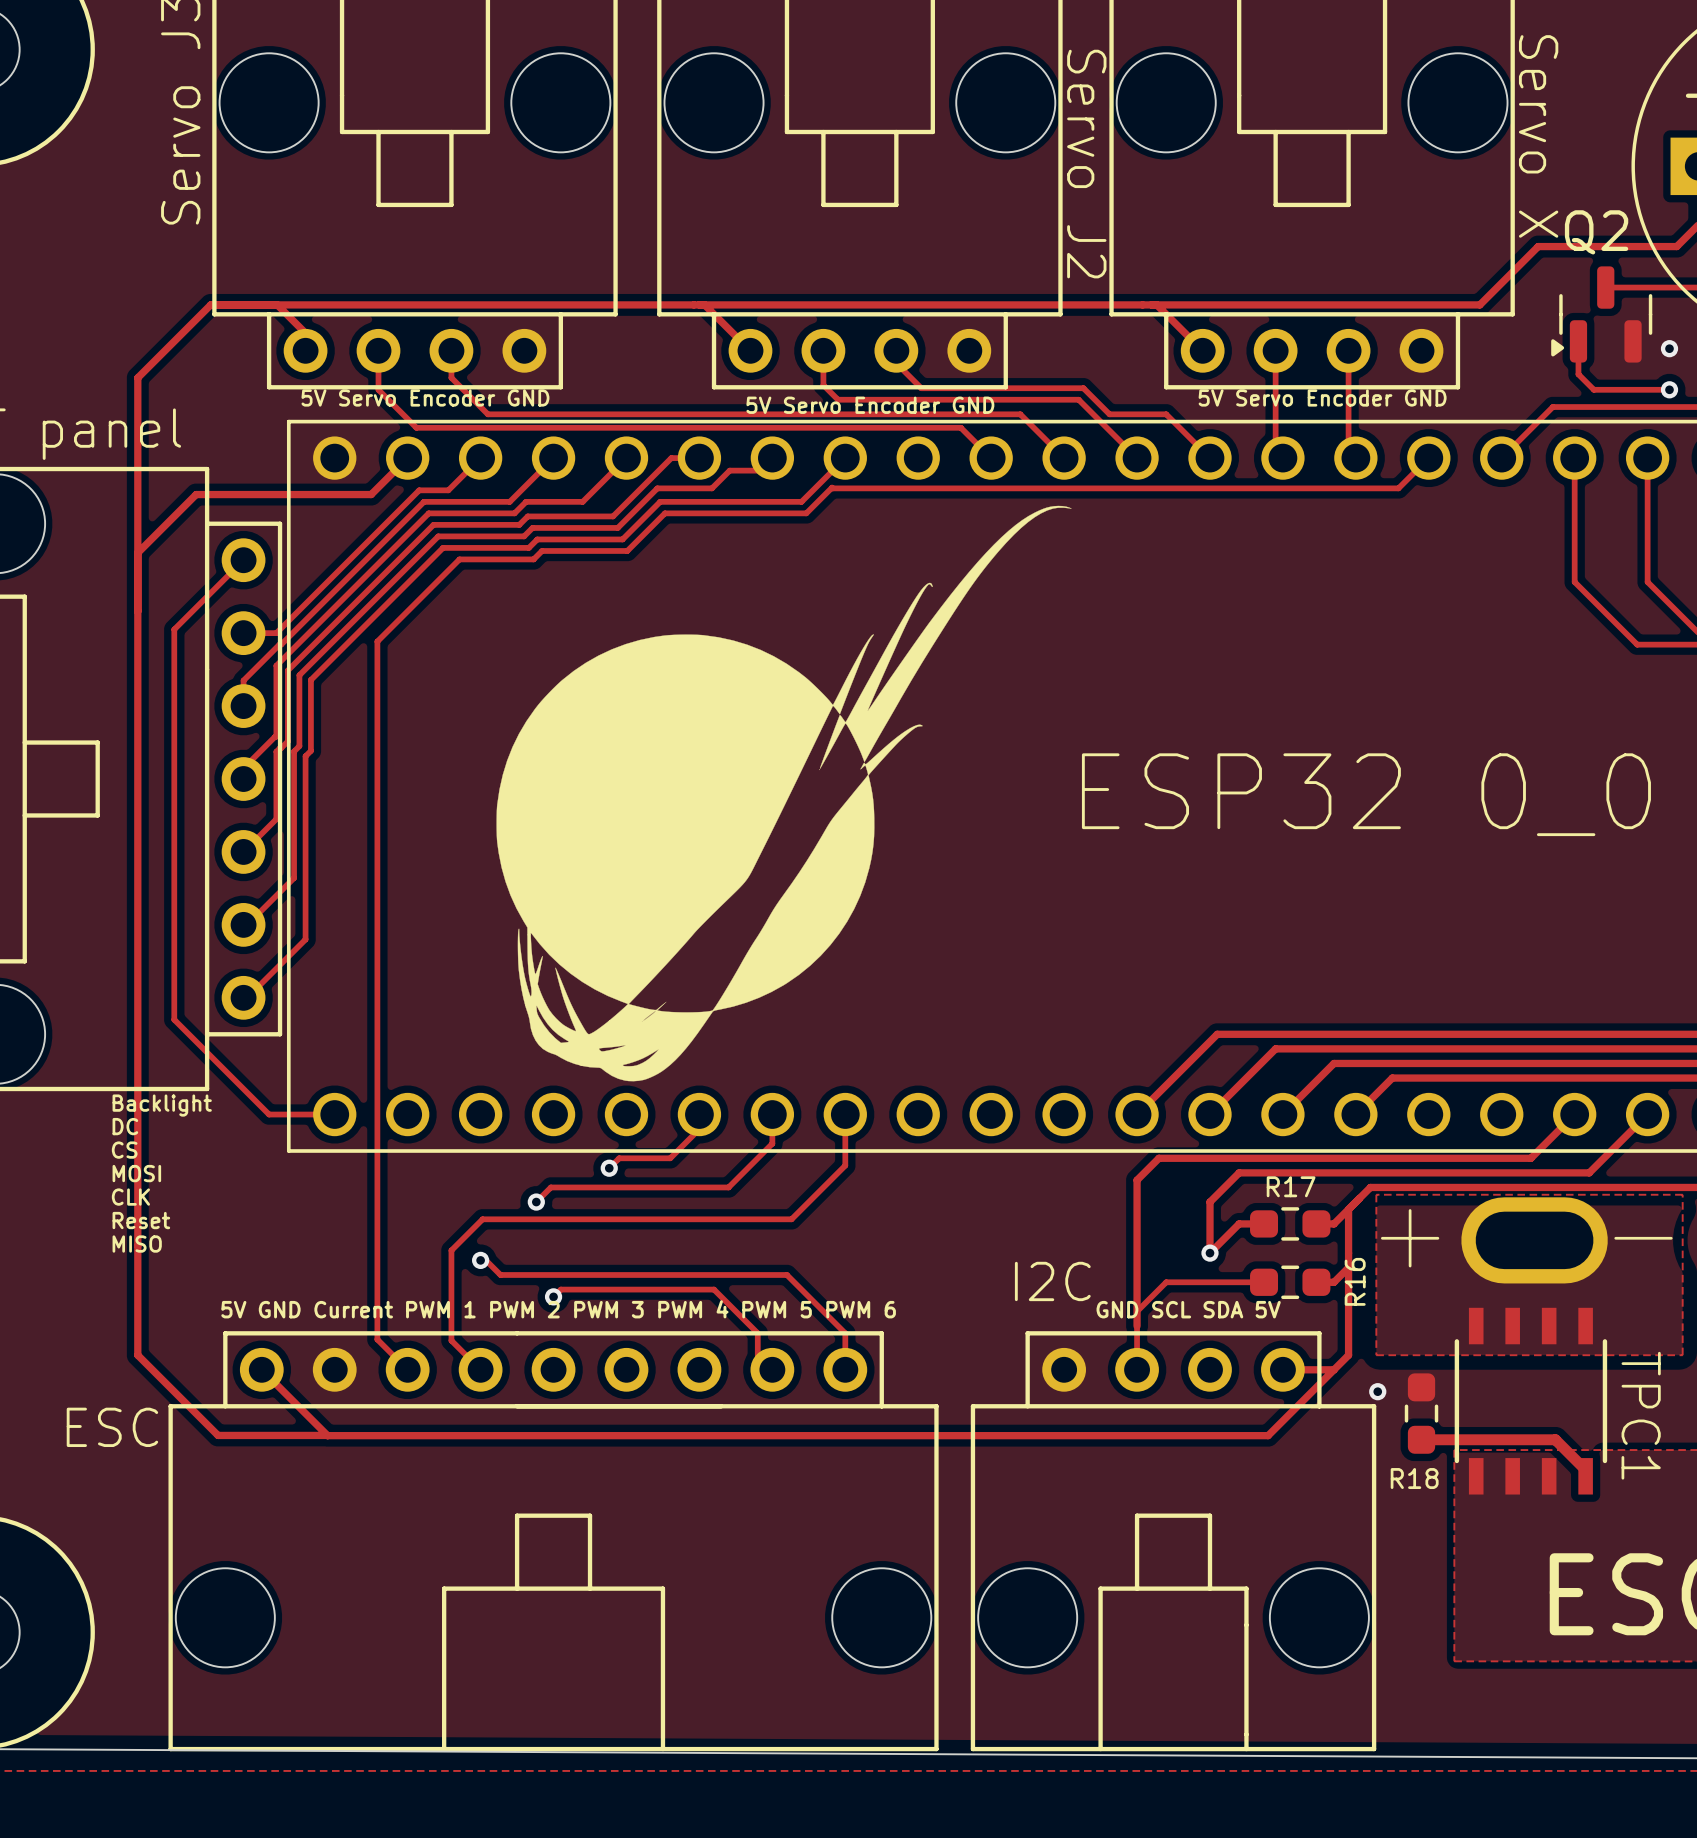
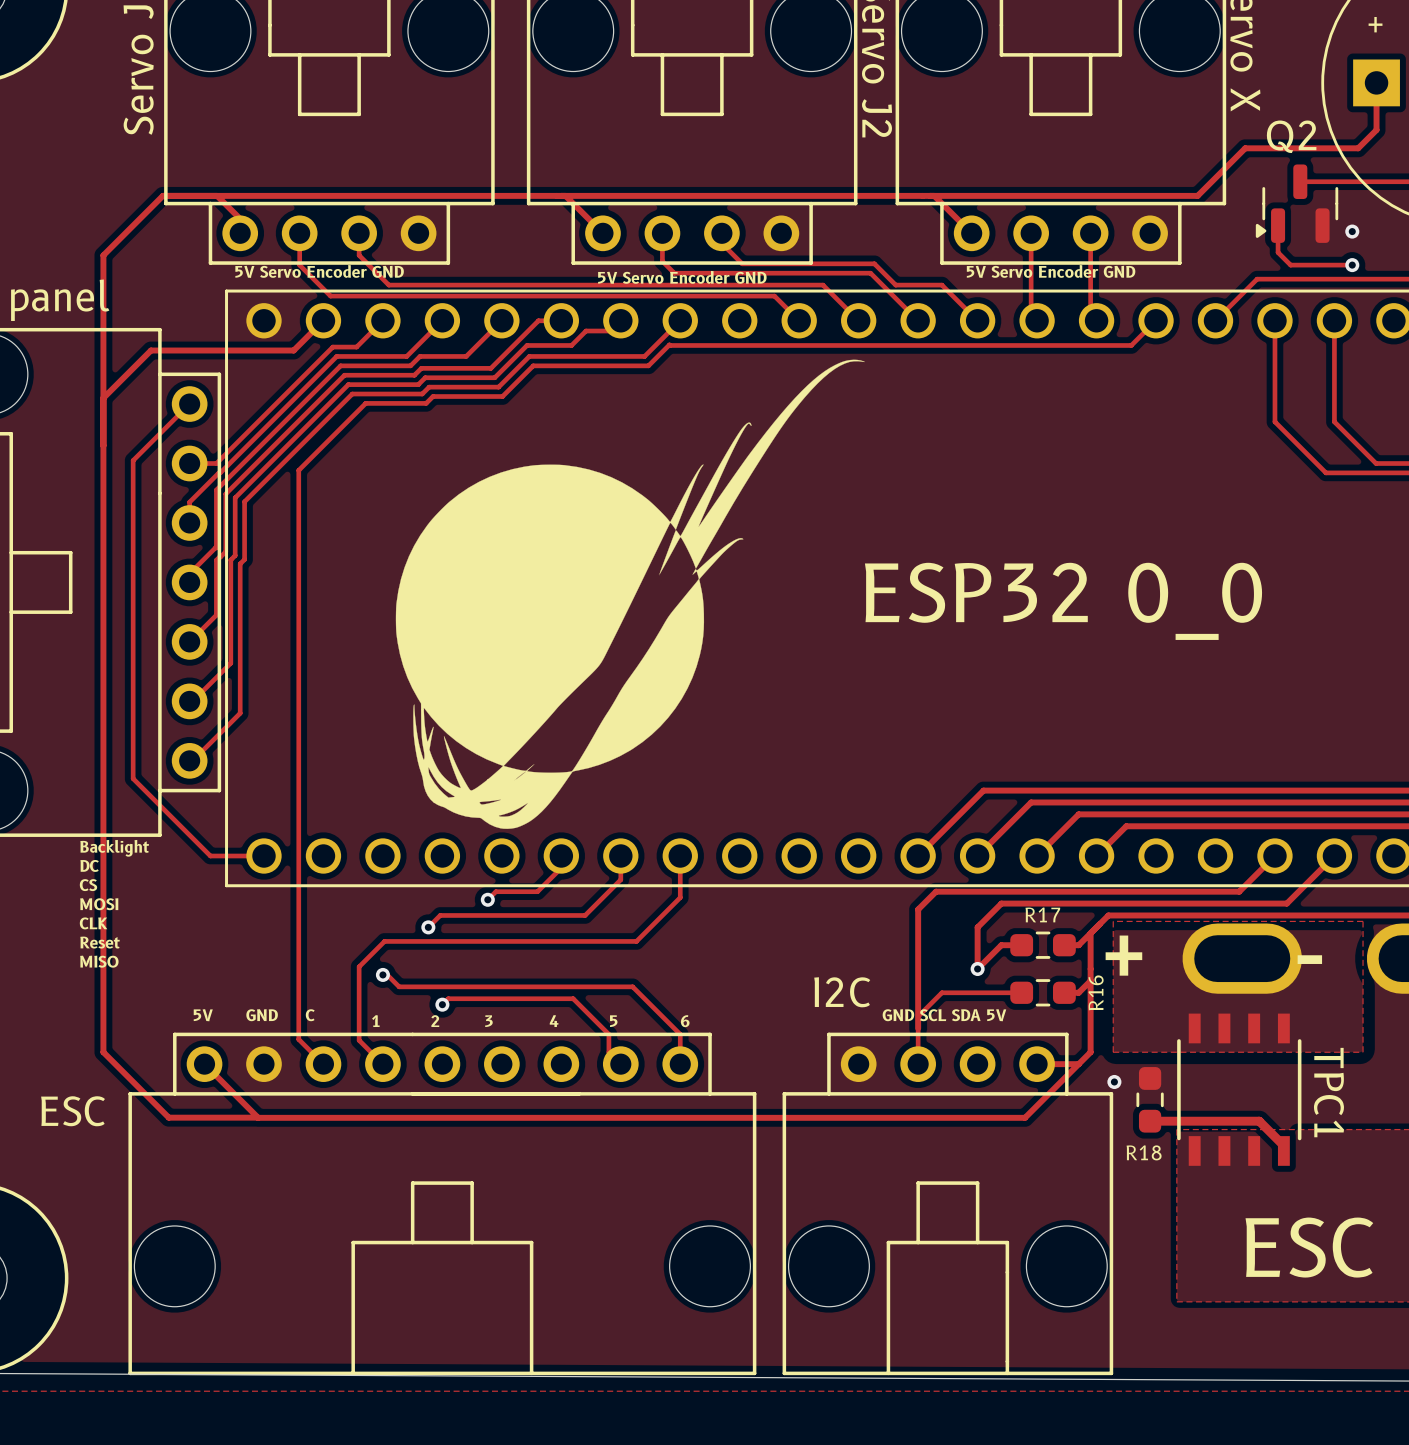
text: none -> 5V (203, 1015)
text: none -> GND (262, 1015)
text: none -> C (310, 1015)
text: 5V GND Current PWM 1 PWM 2 PWM 3 PWM 4 PWM 5 PWM 6 (558, 1309) -> none
text: none -> 1 (375, 1021)
text: none -> 2 (435, 1021)
text: none -> 3 (488, 1021)
text: none -> 4 (554, 1021)
text: none -> 5 (613, 1021)
text: none -> 6 (685, 1021)

